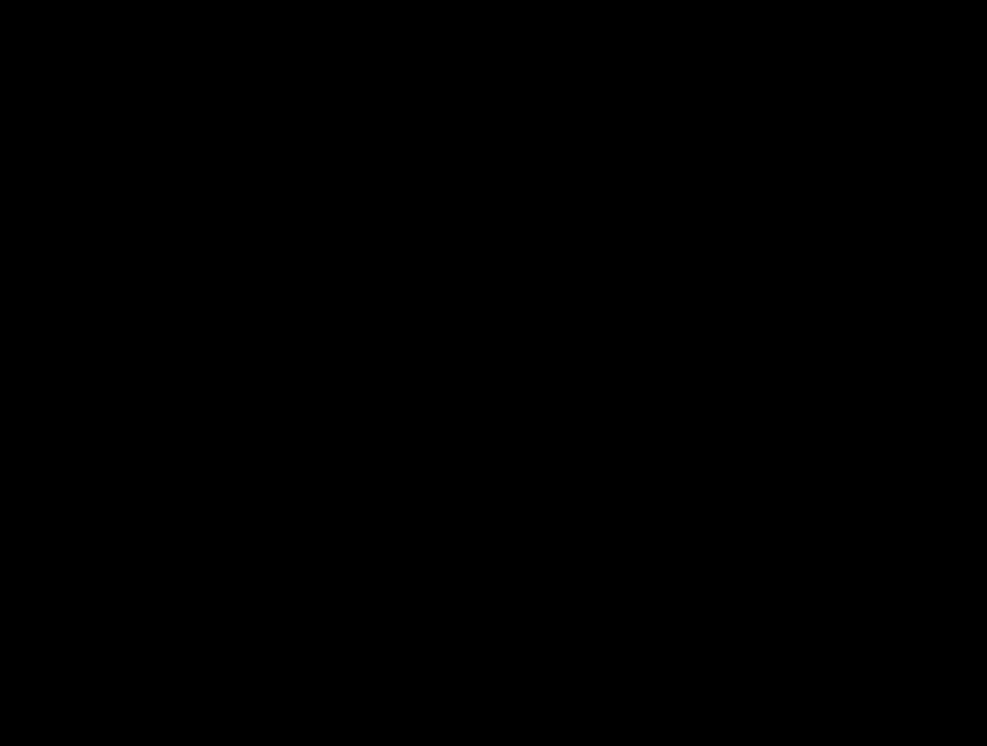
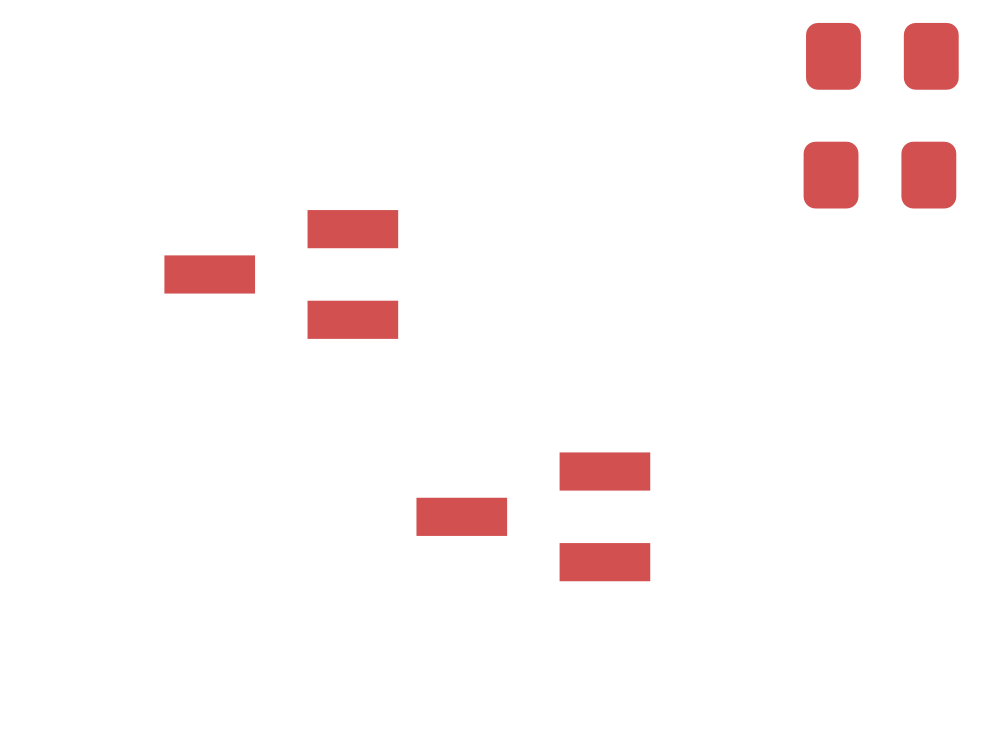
part: none -> (882, 56)
part: none -> (879, 175)
part: none -> (281, 274)
part: none -> (533, 516)

